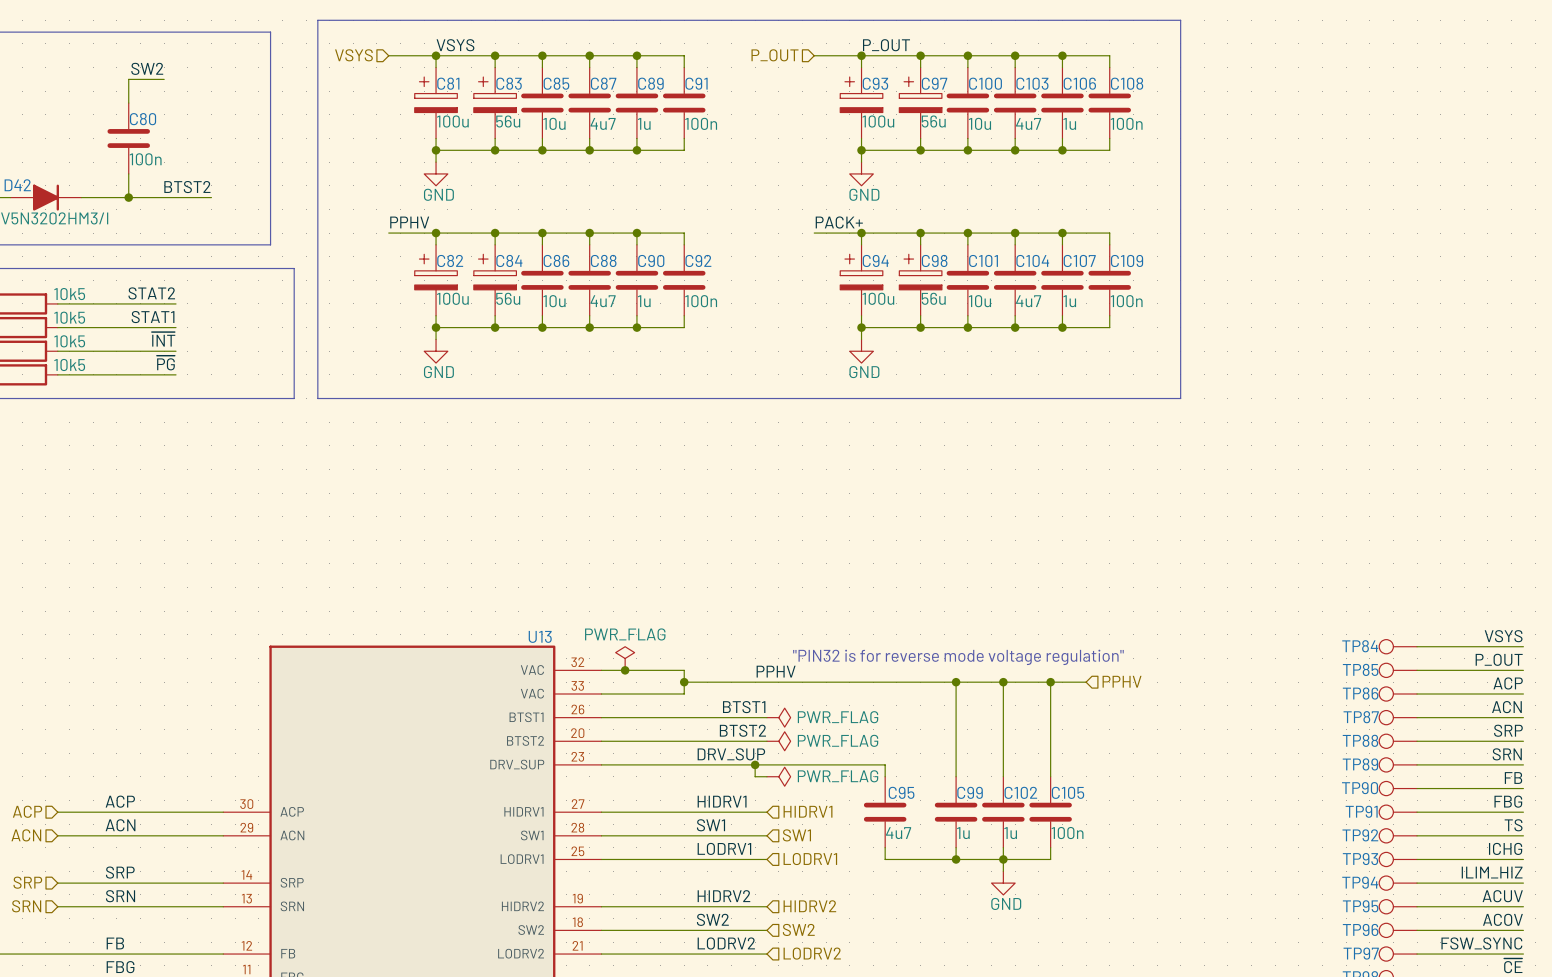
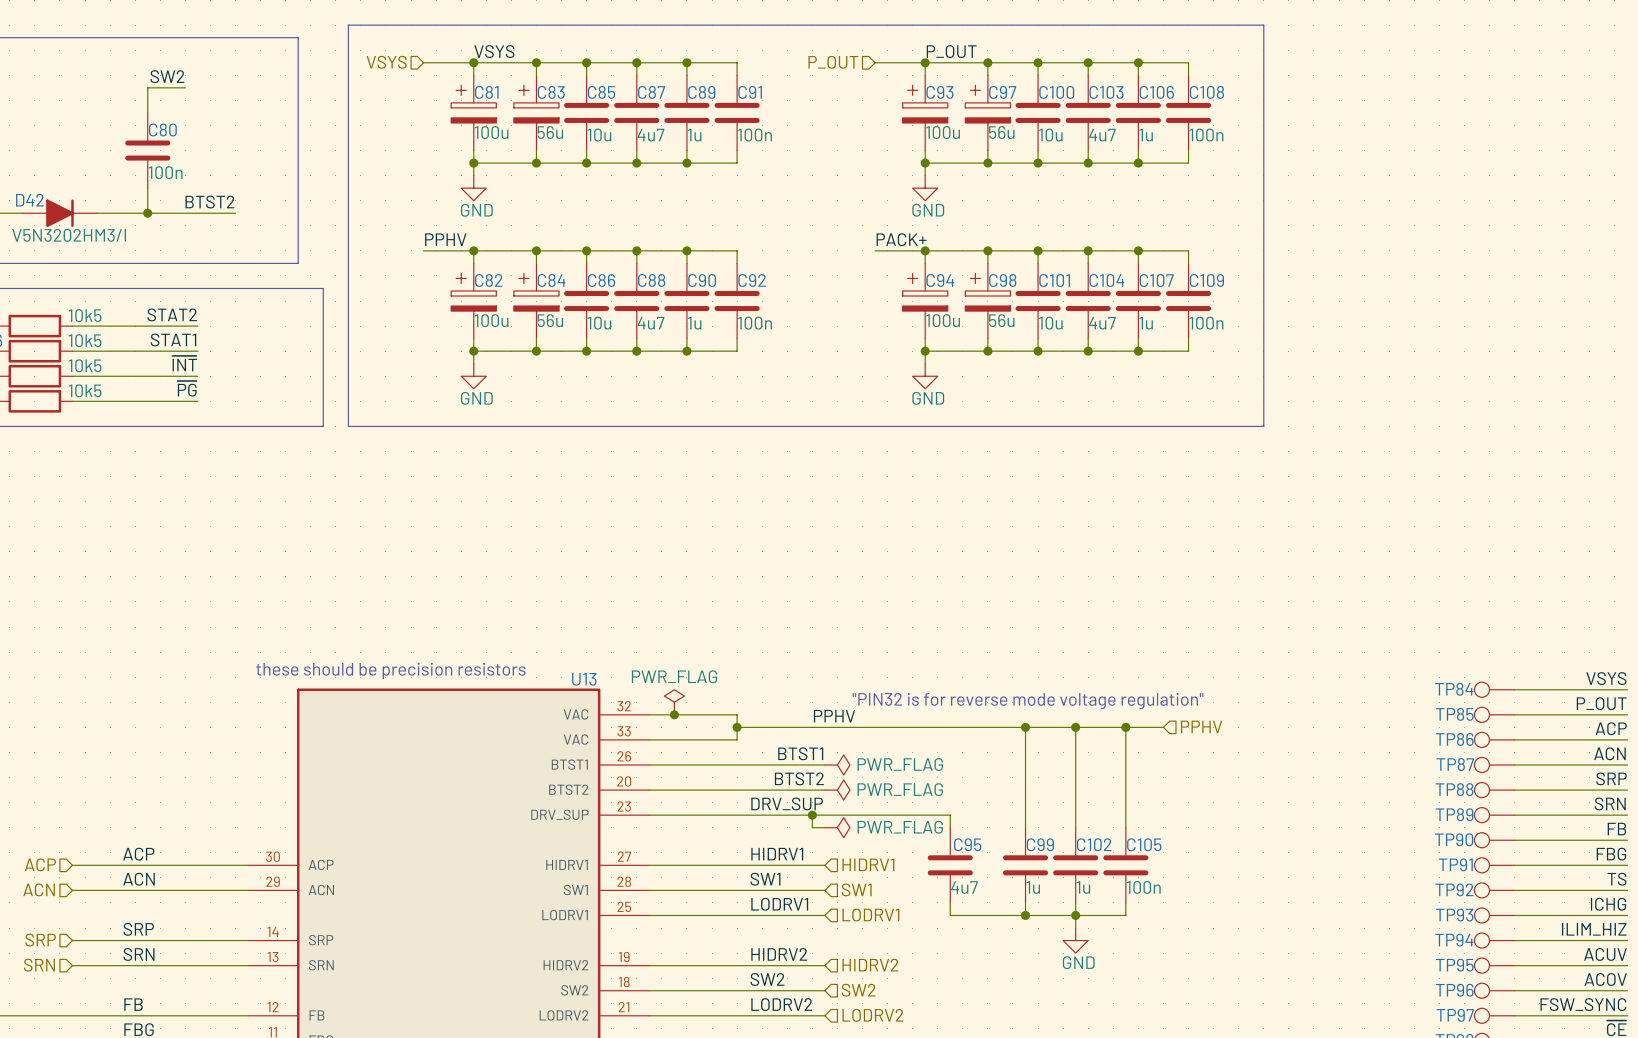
text: none -> these should be precision resistors (390, 670)

